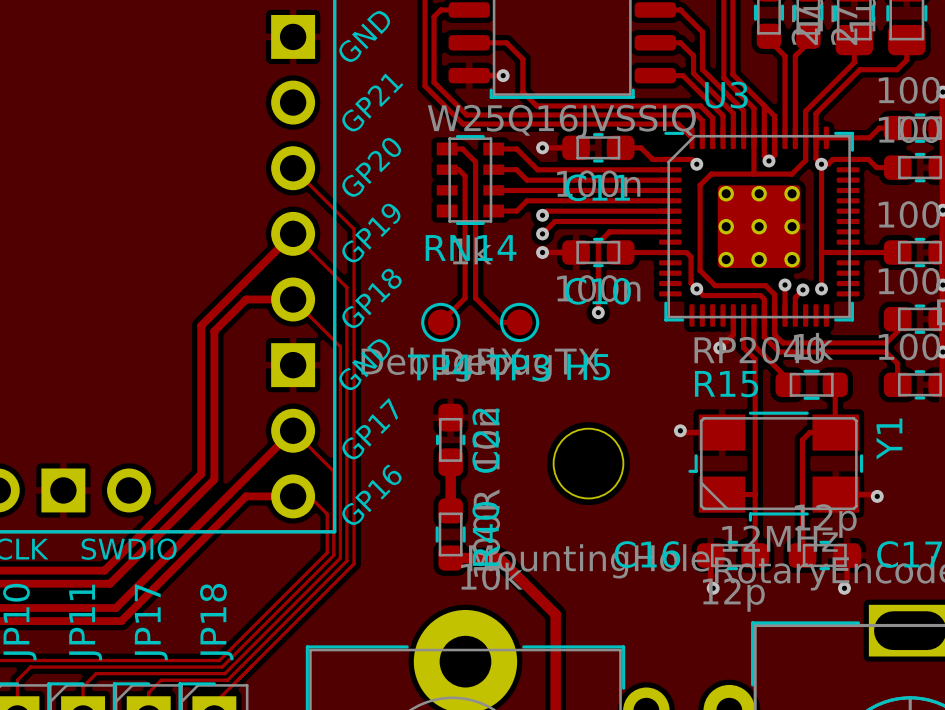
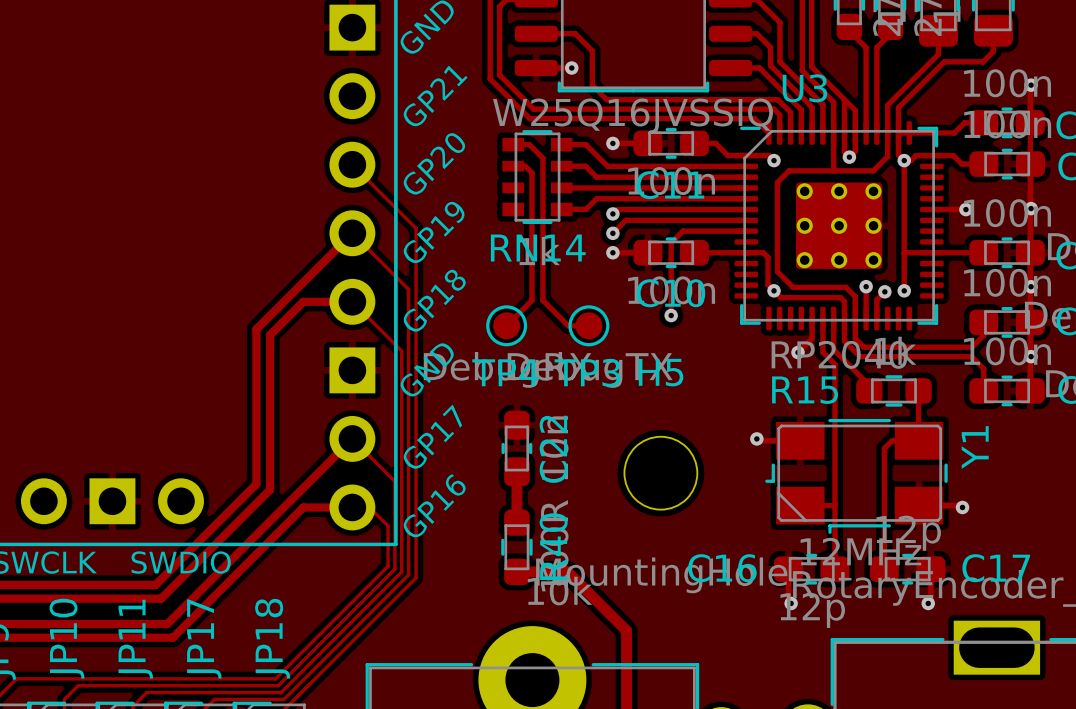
track: none -> (931, 209) (965, 209)
via: none -> (965, 209)

